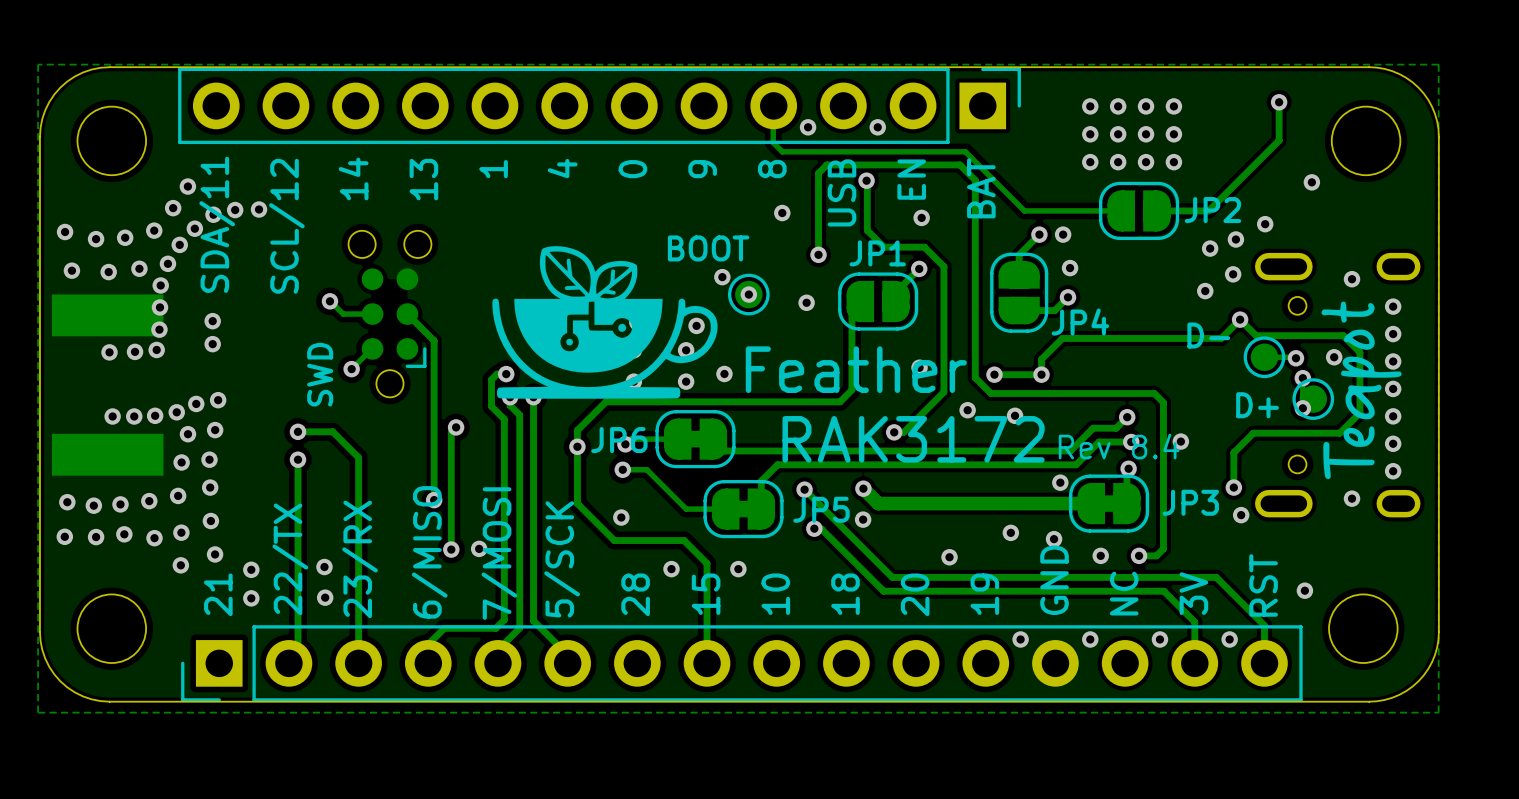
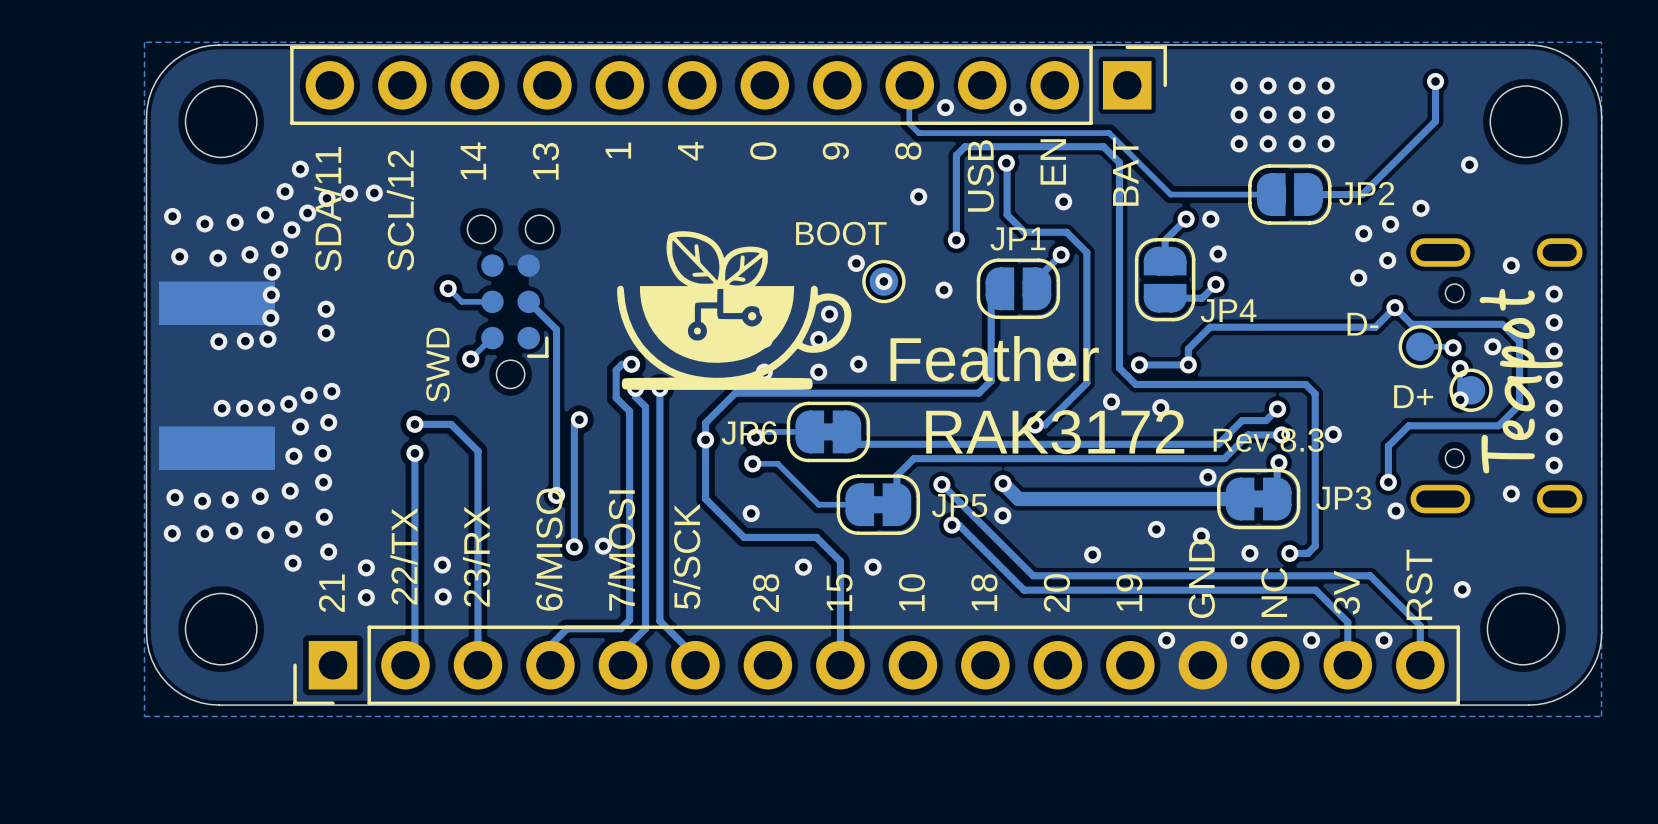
text: Rev 8.4 (1119, 446) -> Rev 8.3 (1268, 440)

